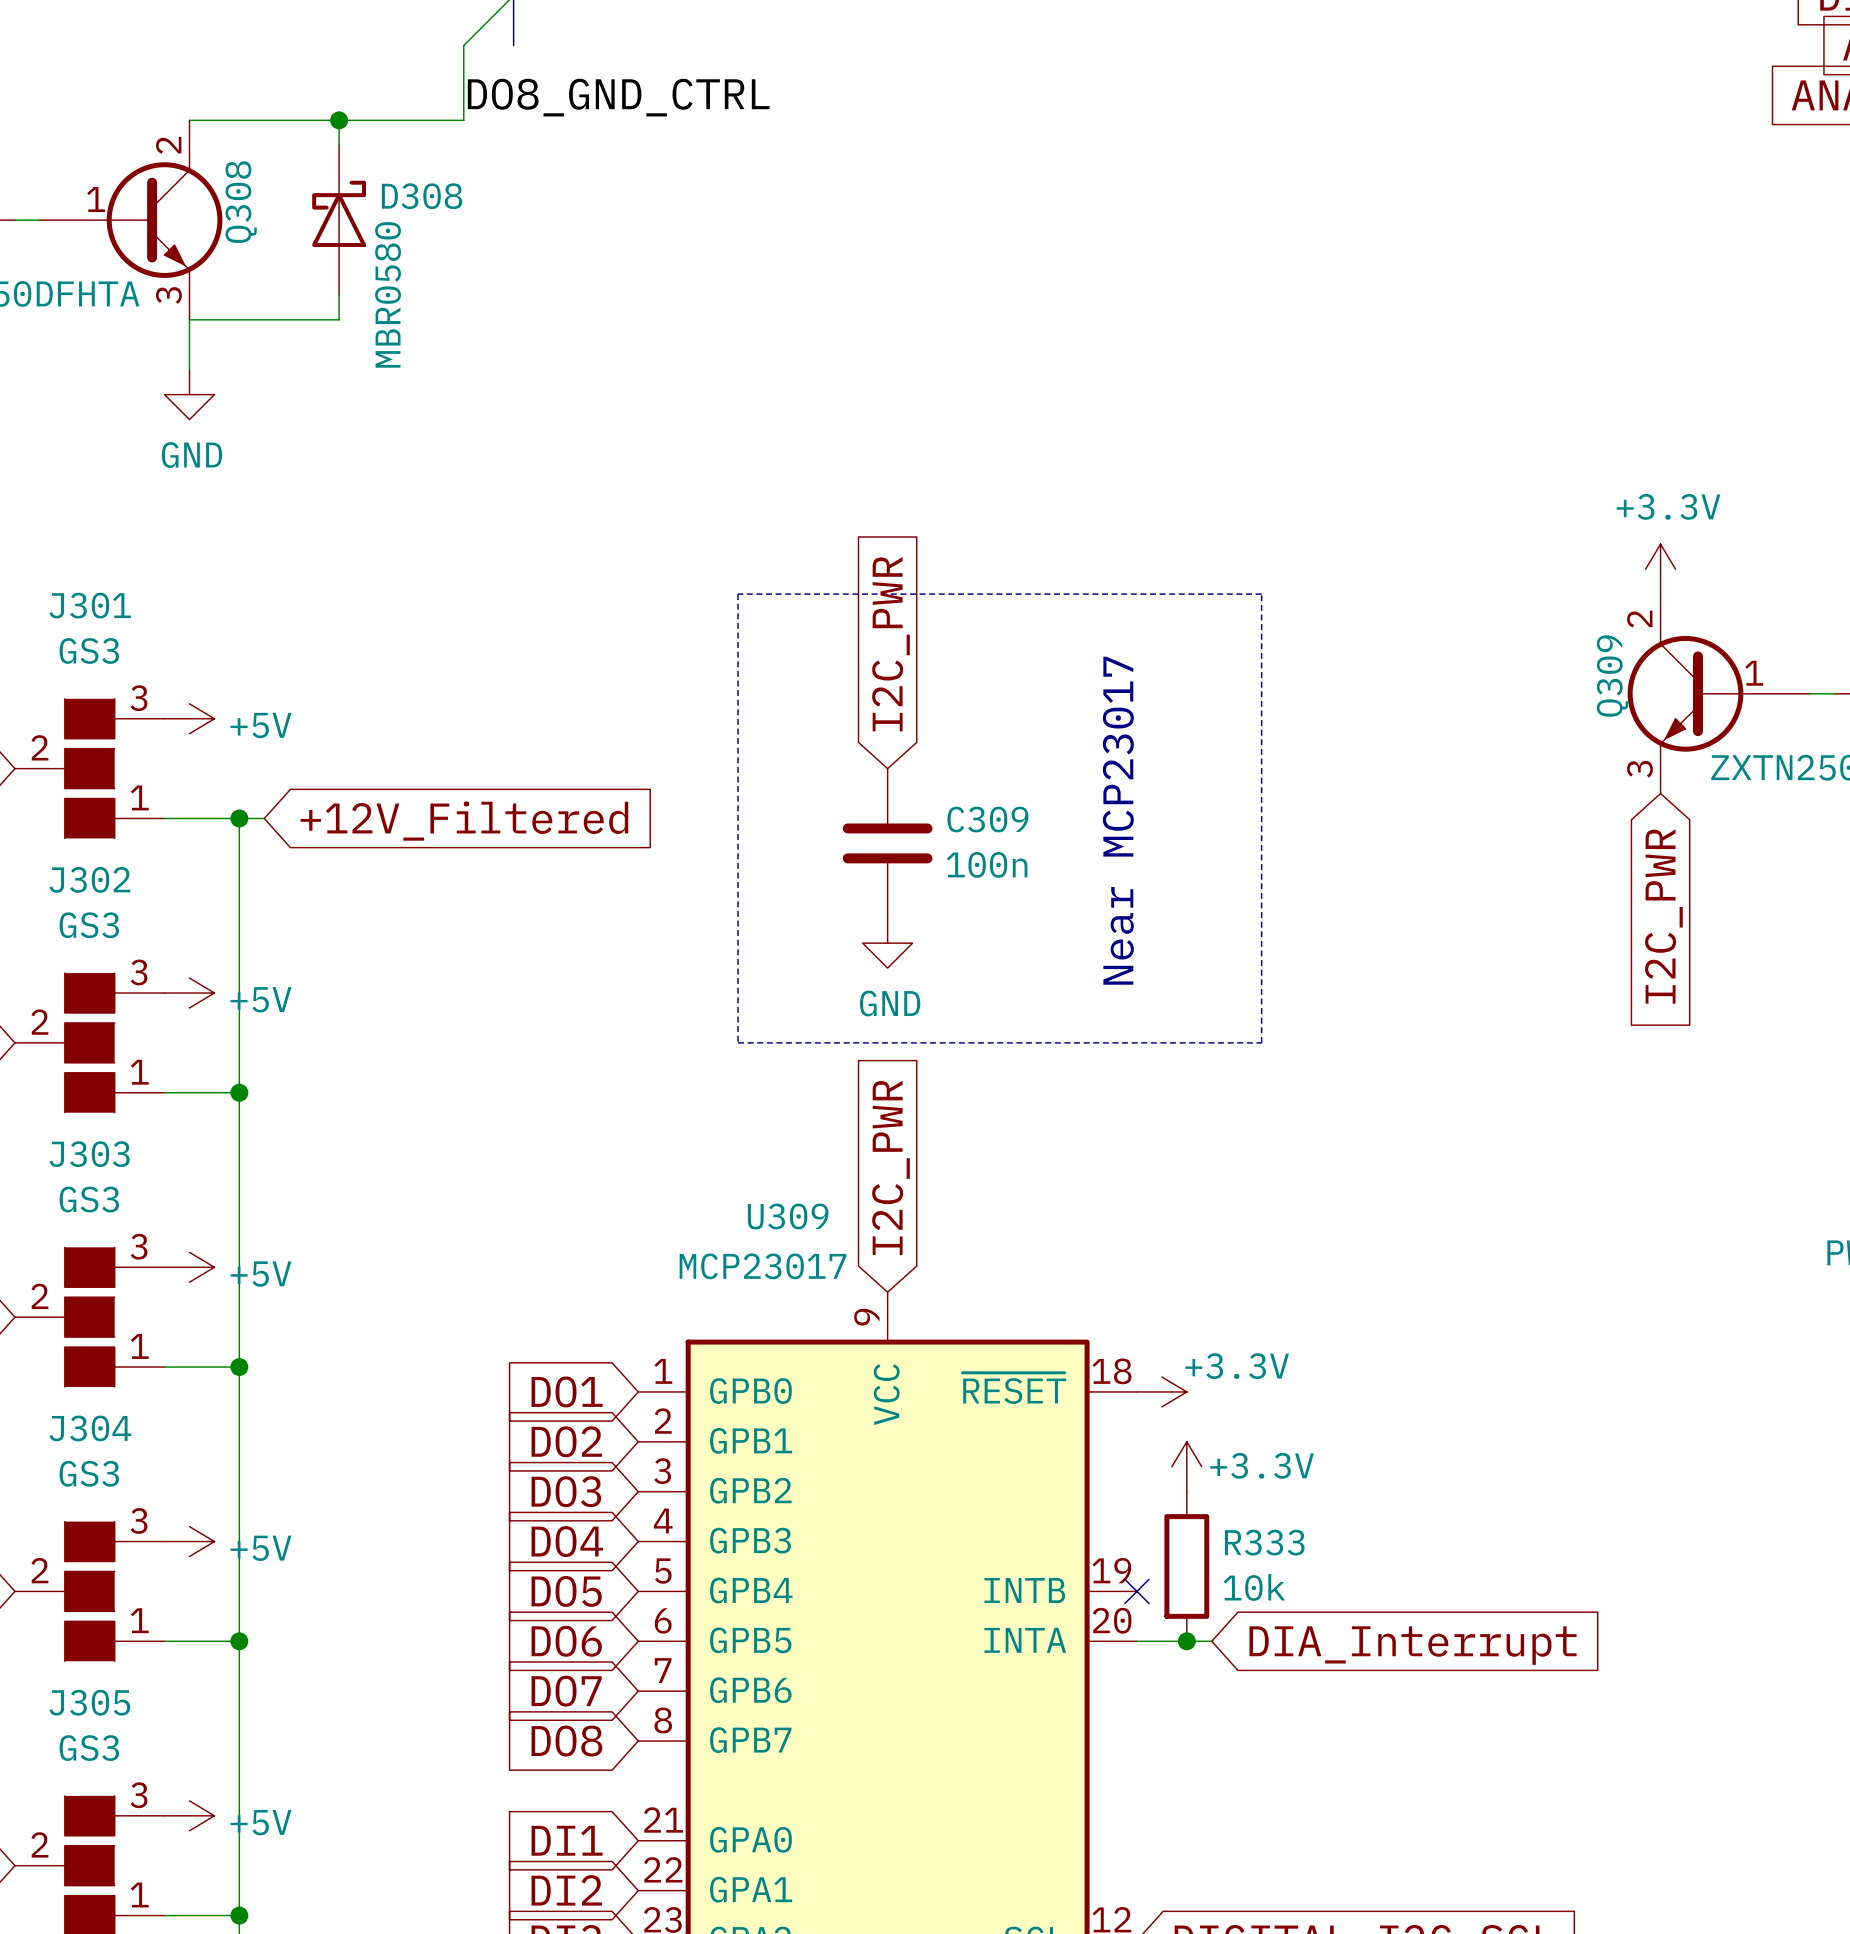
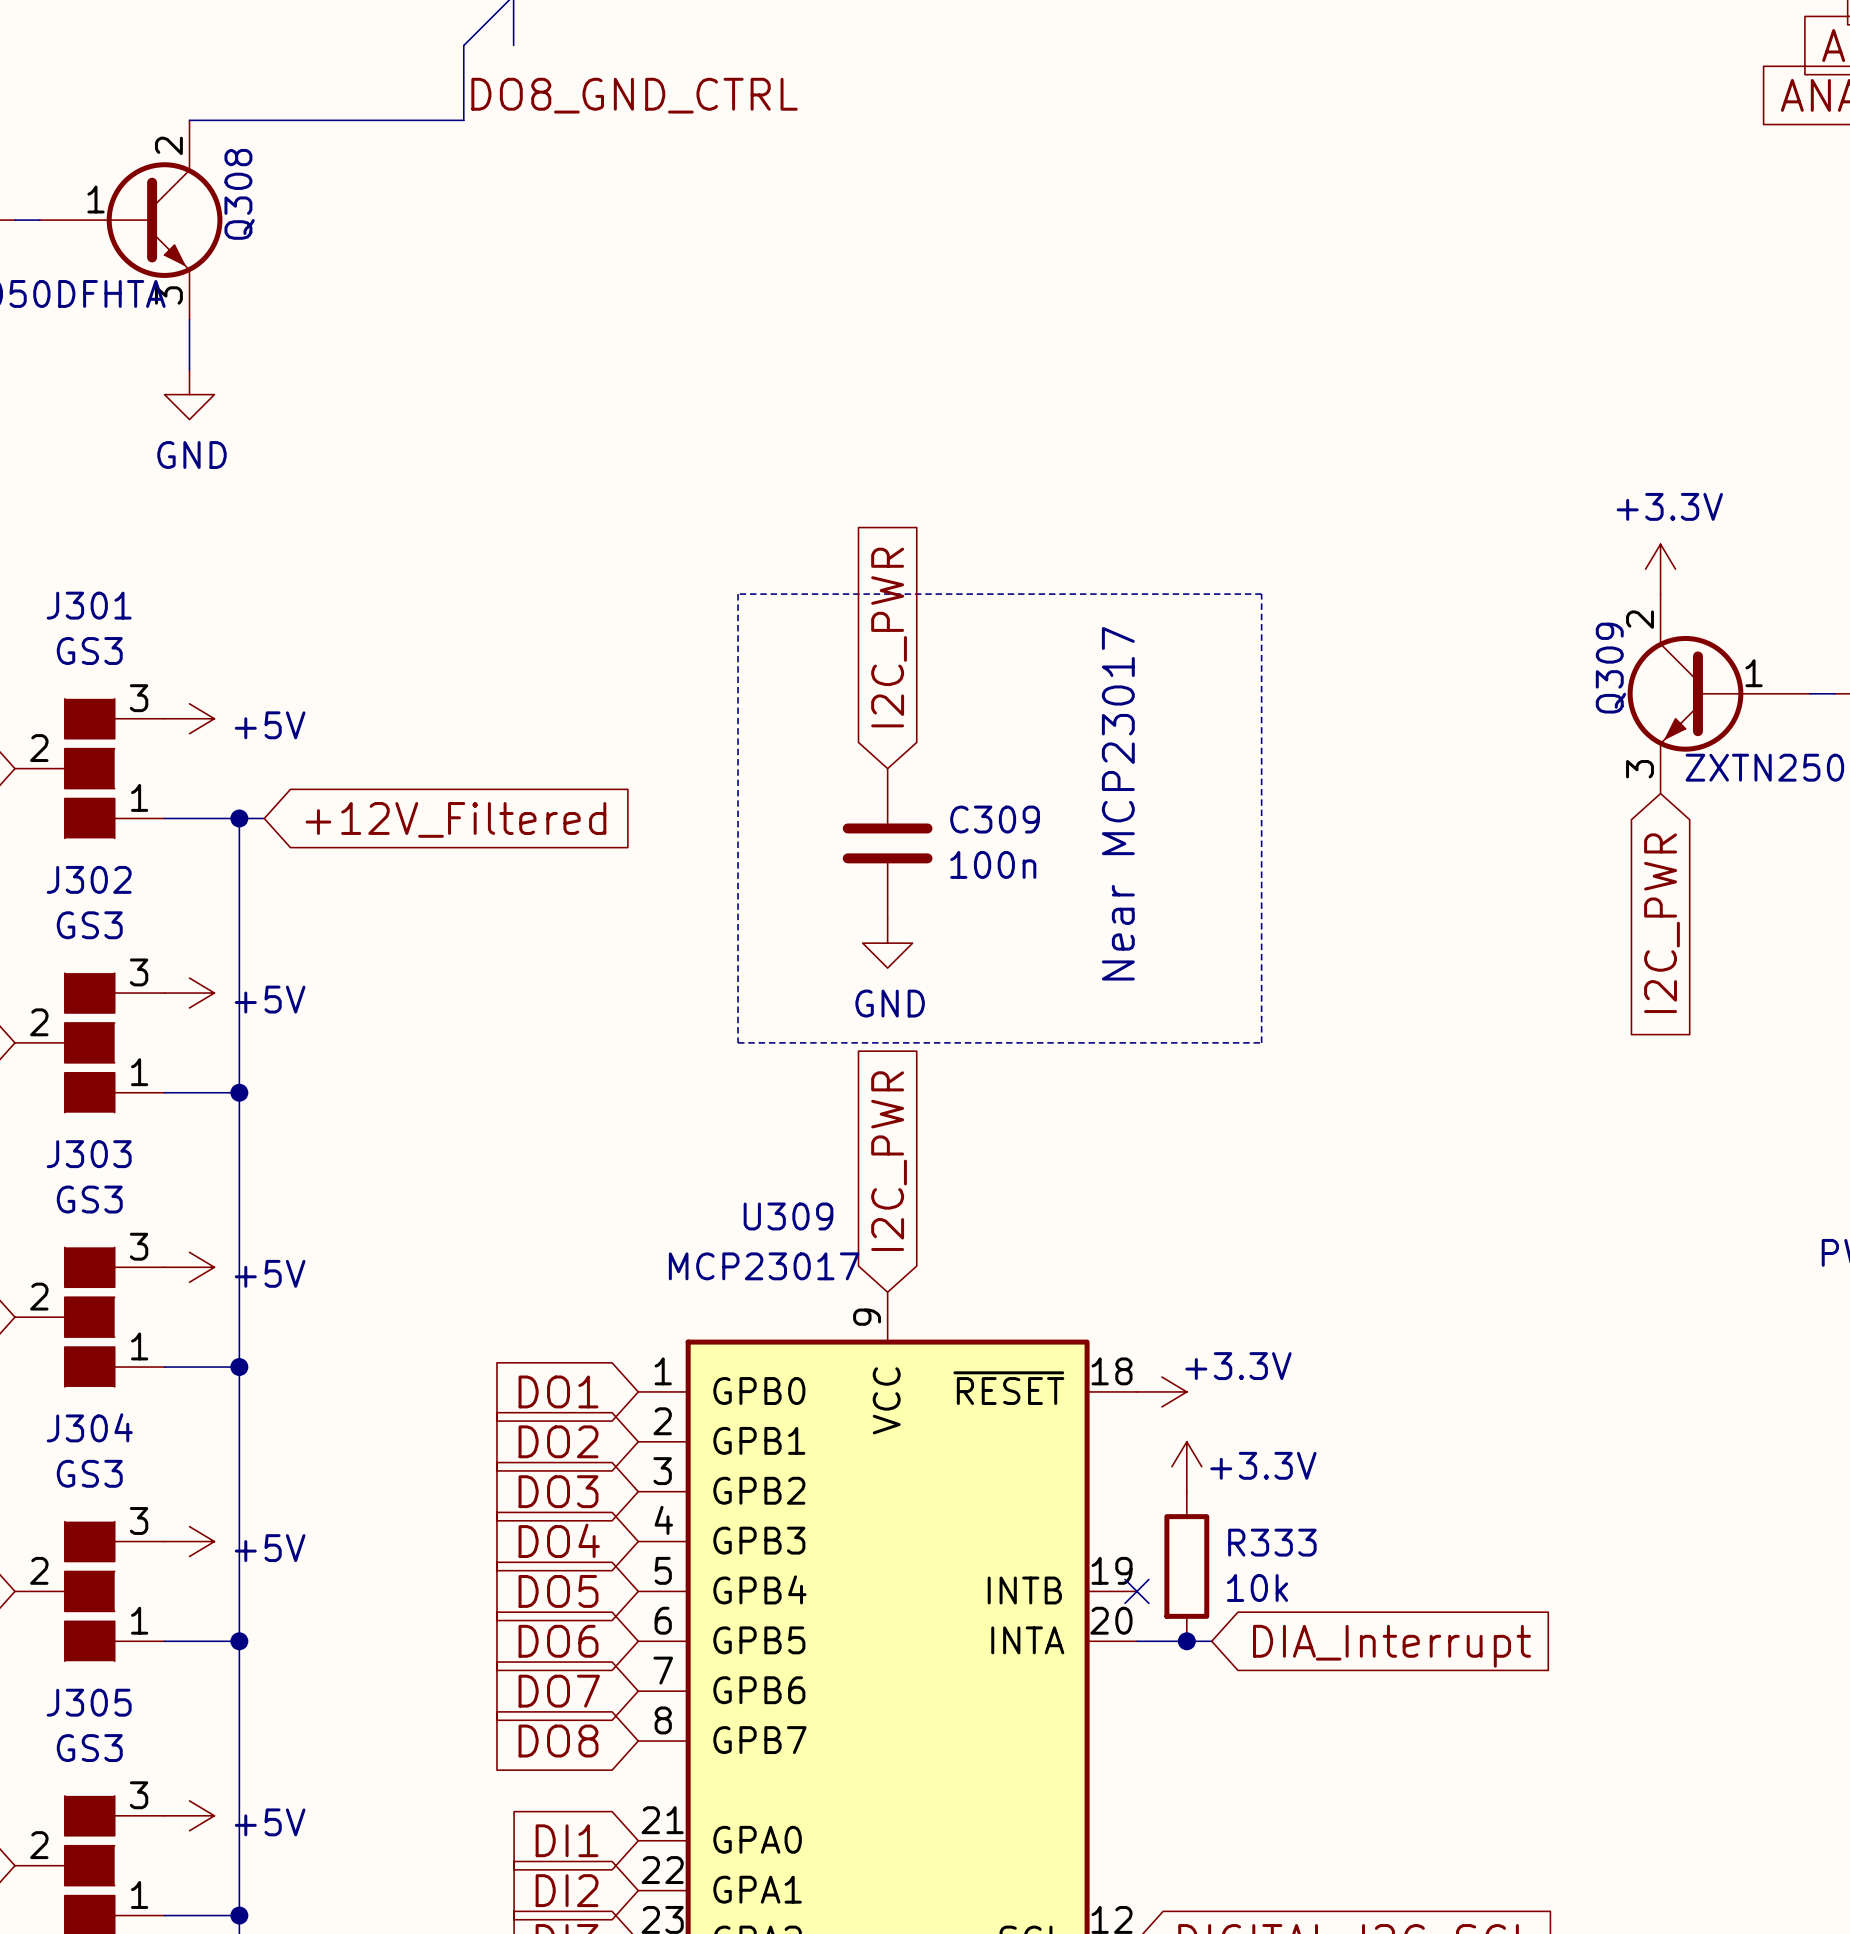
wire: (339, 120) (339, 145) -> none
junction: (339, 120) -> none
D308: MBR0580 (339, 220) -> none
wire: (339, 294) (339, 319) (189, 319) -> none

